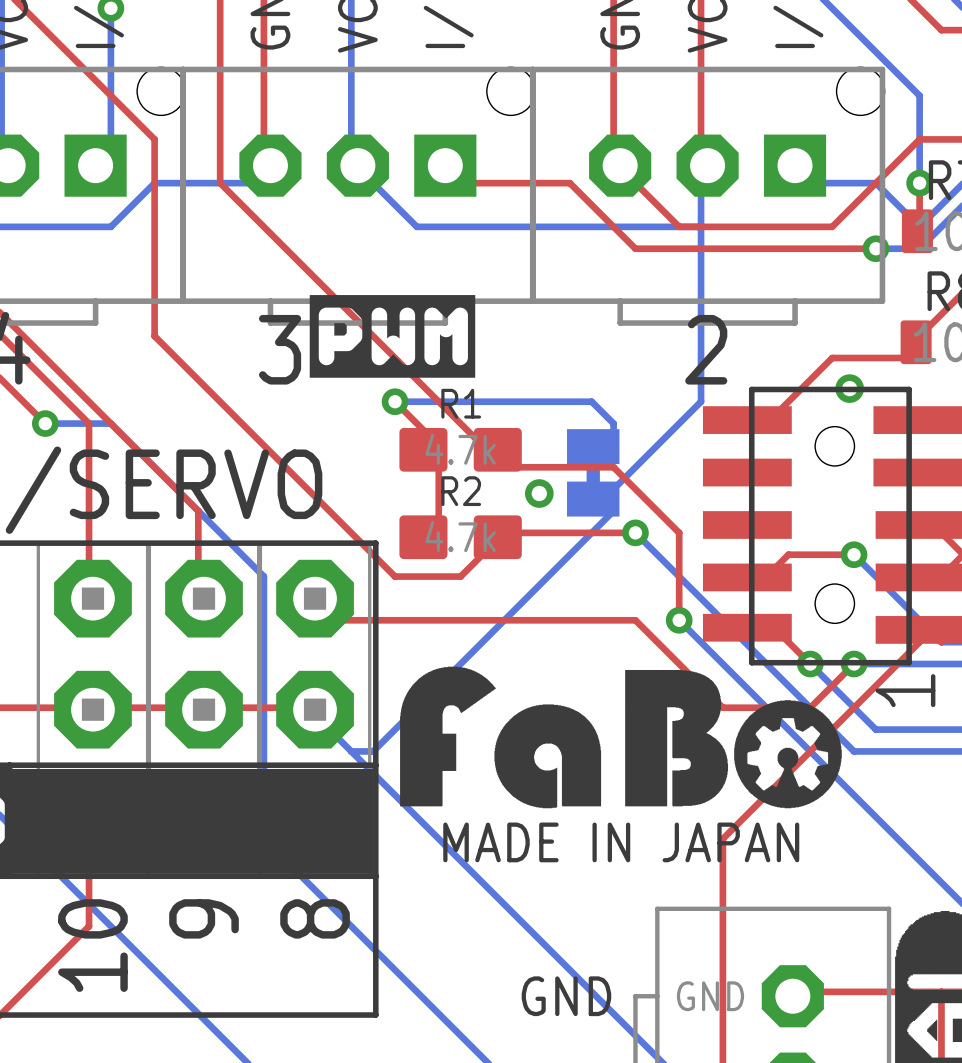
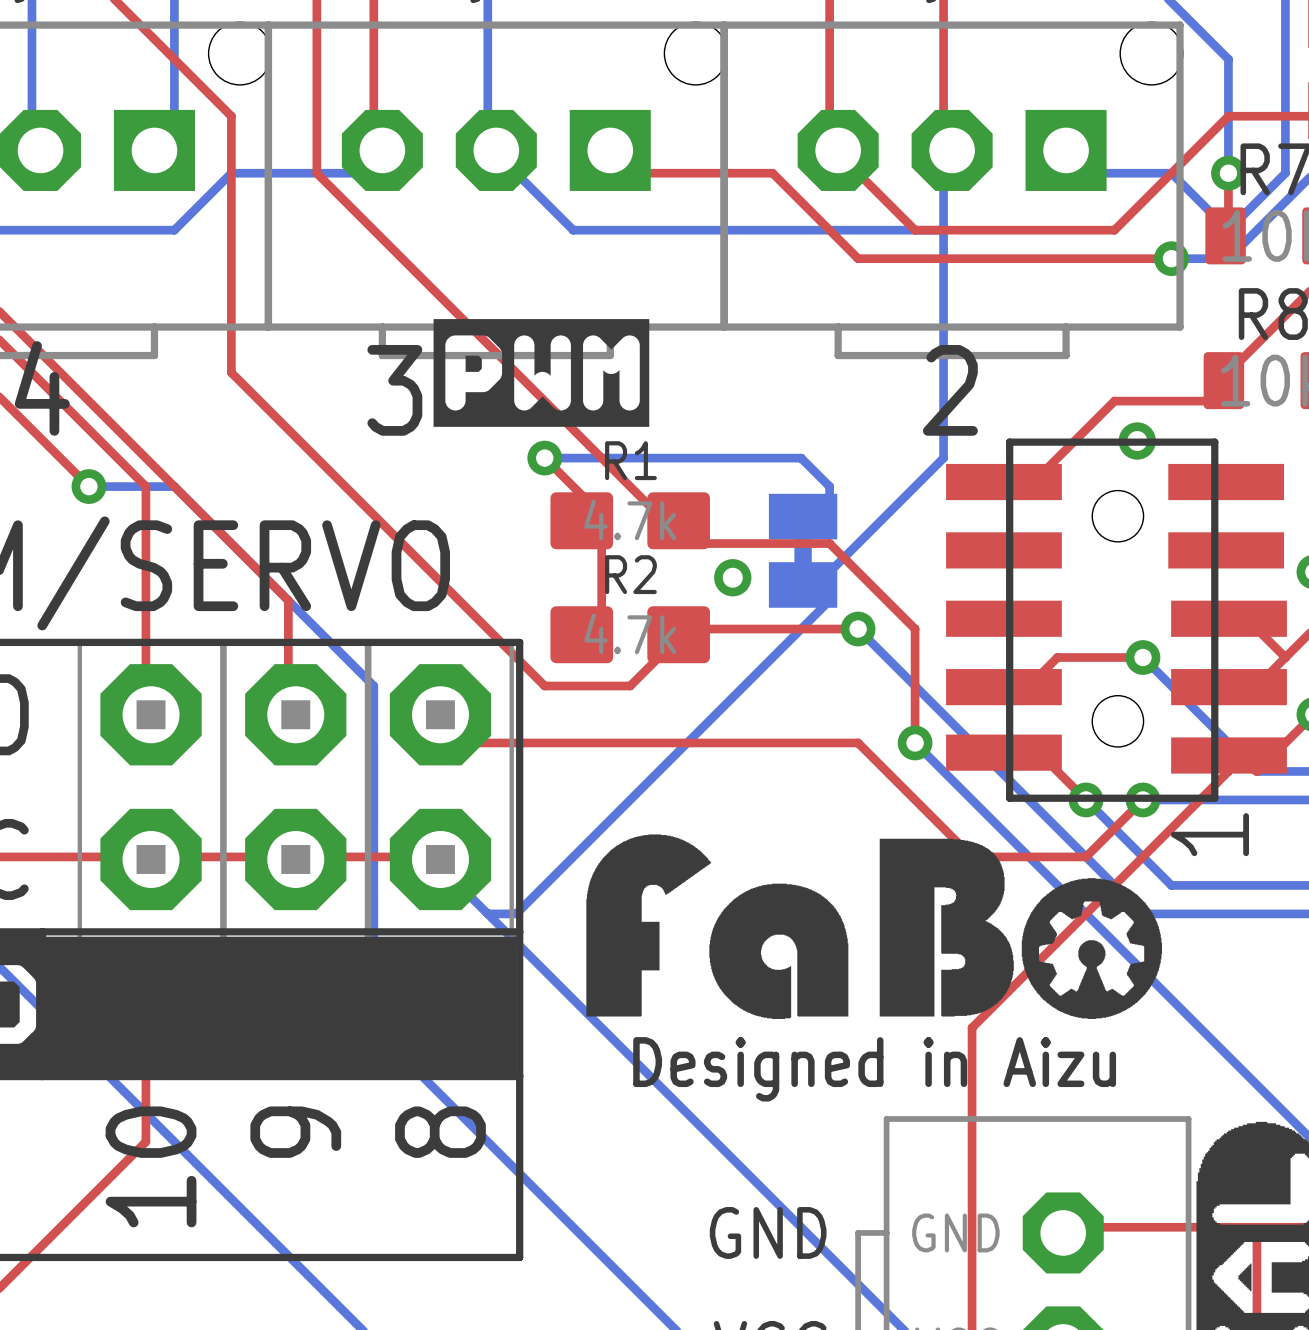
drawing position: (620, 737) -> (874, 926)
text: MADE IN JAPAN (621, 842) -> Designed in Aizu (874, 1069)

